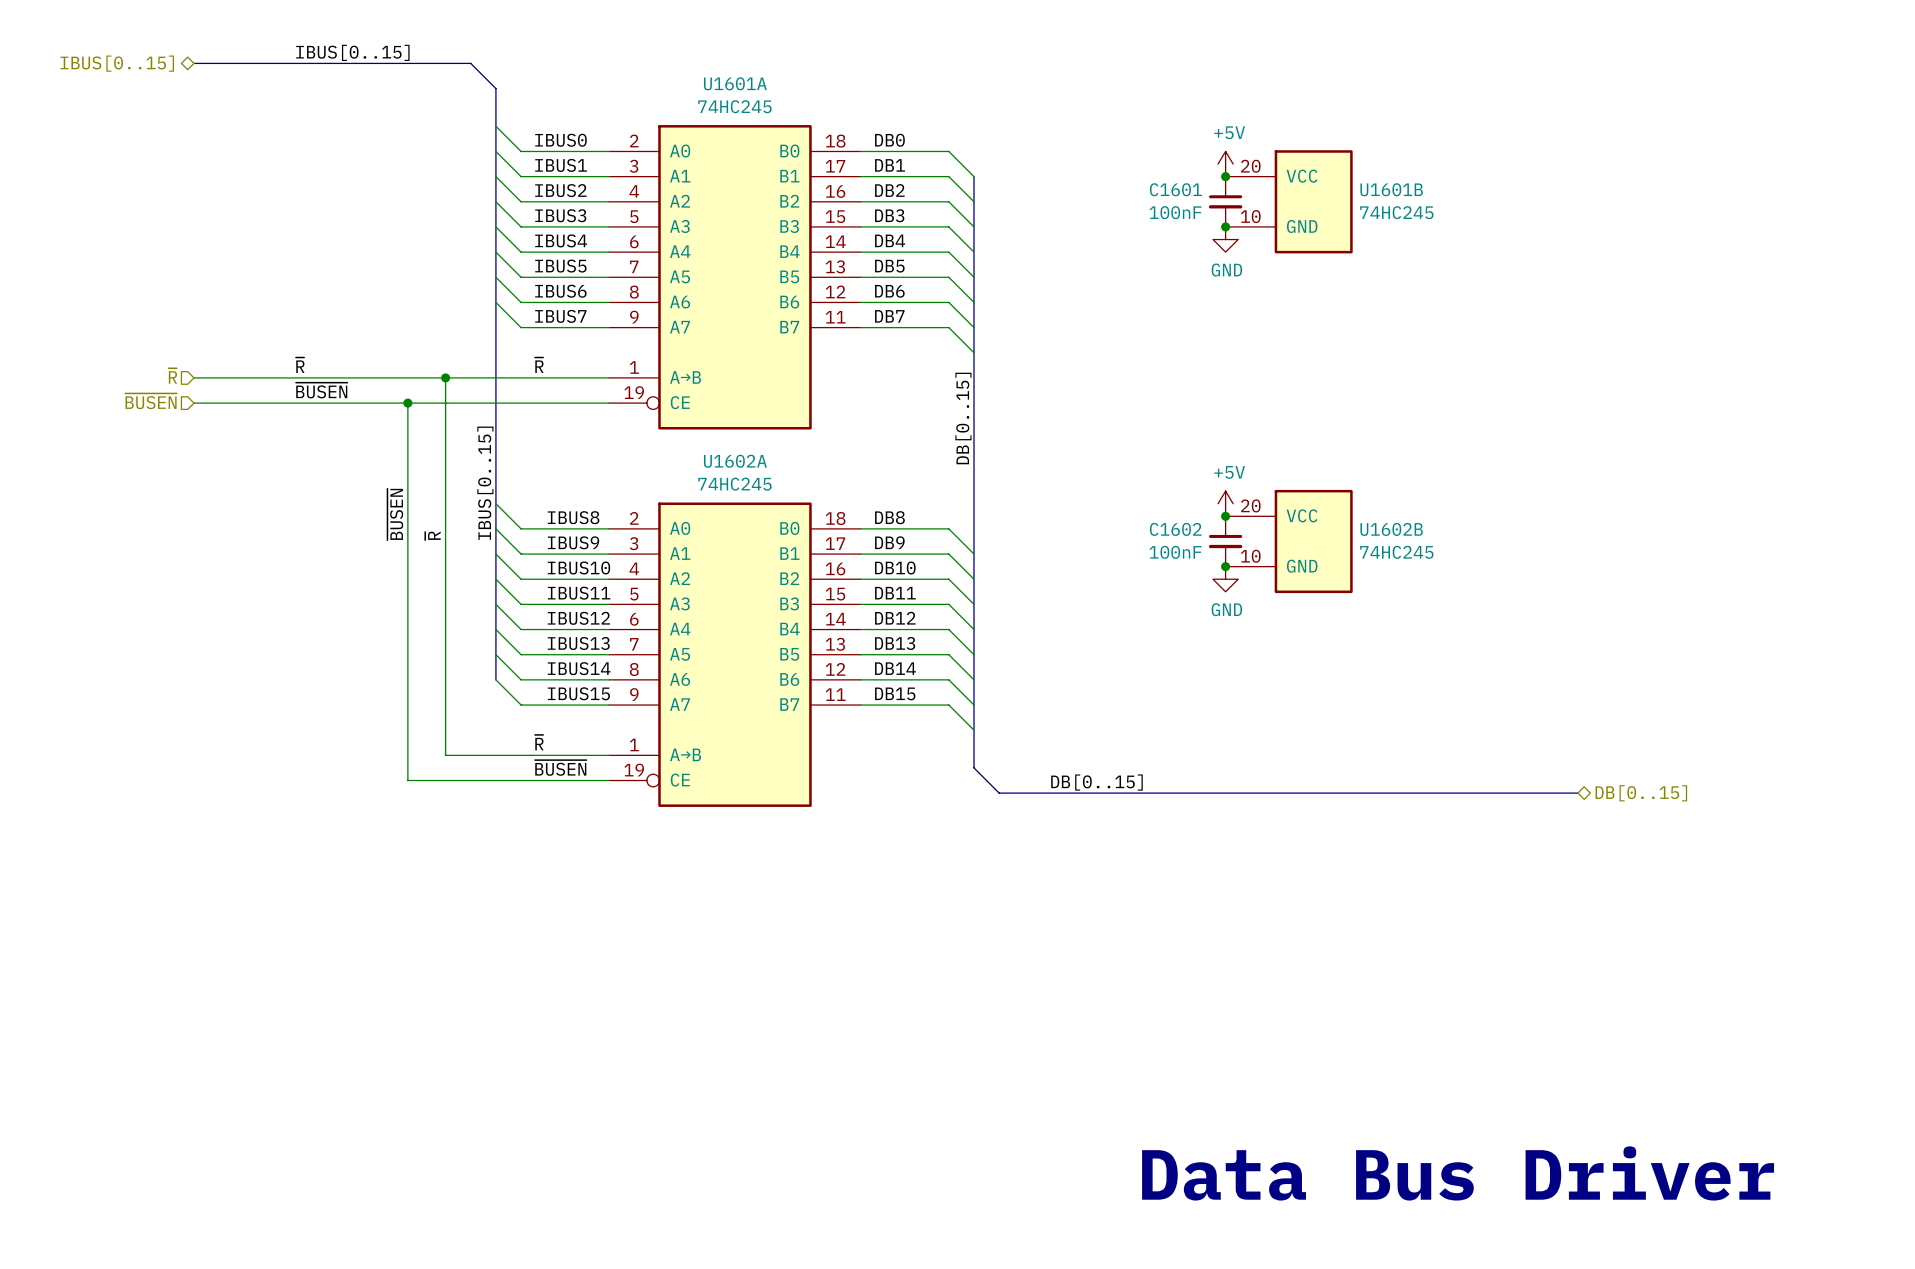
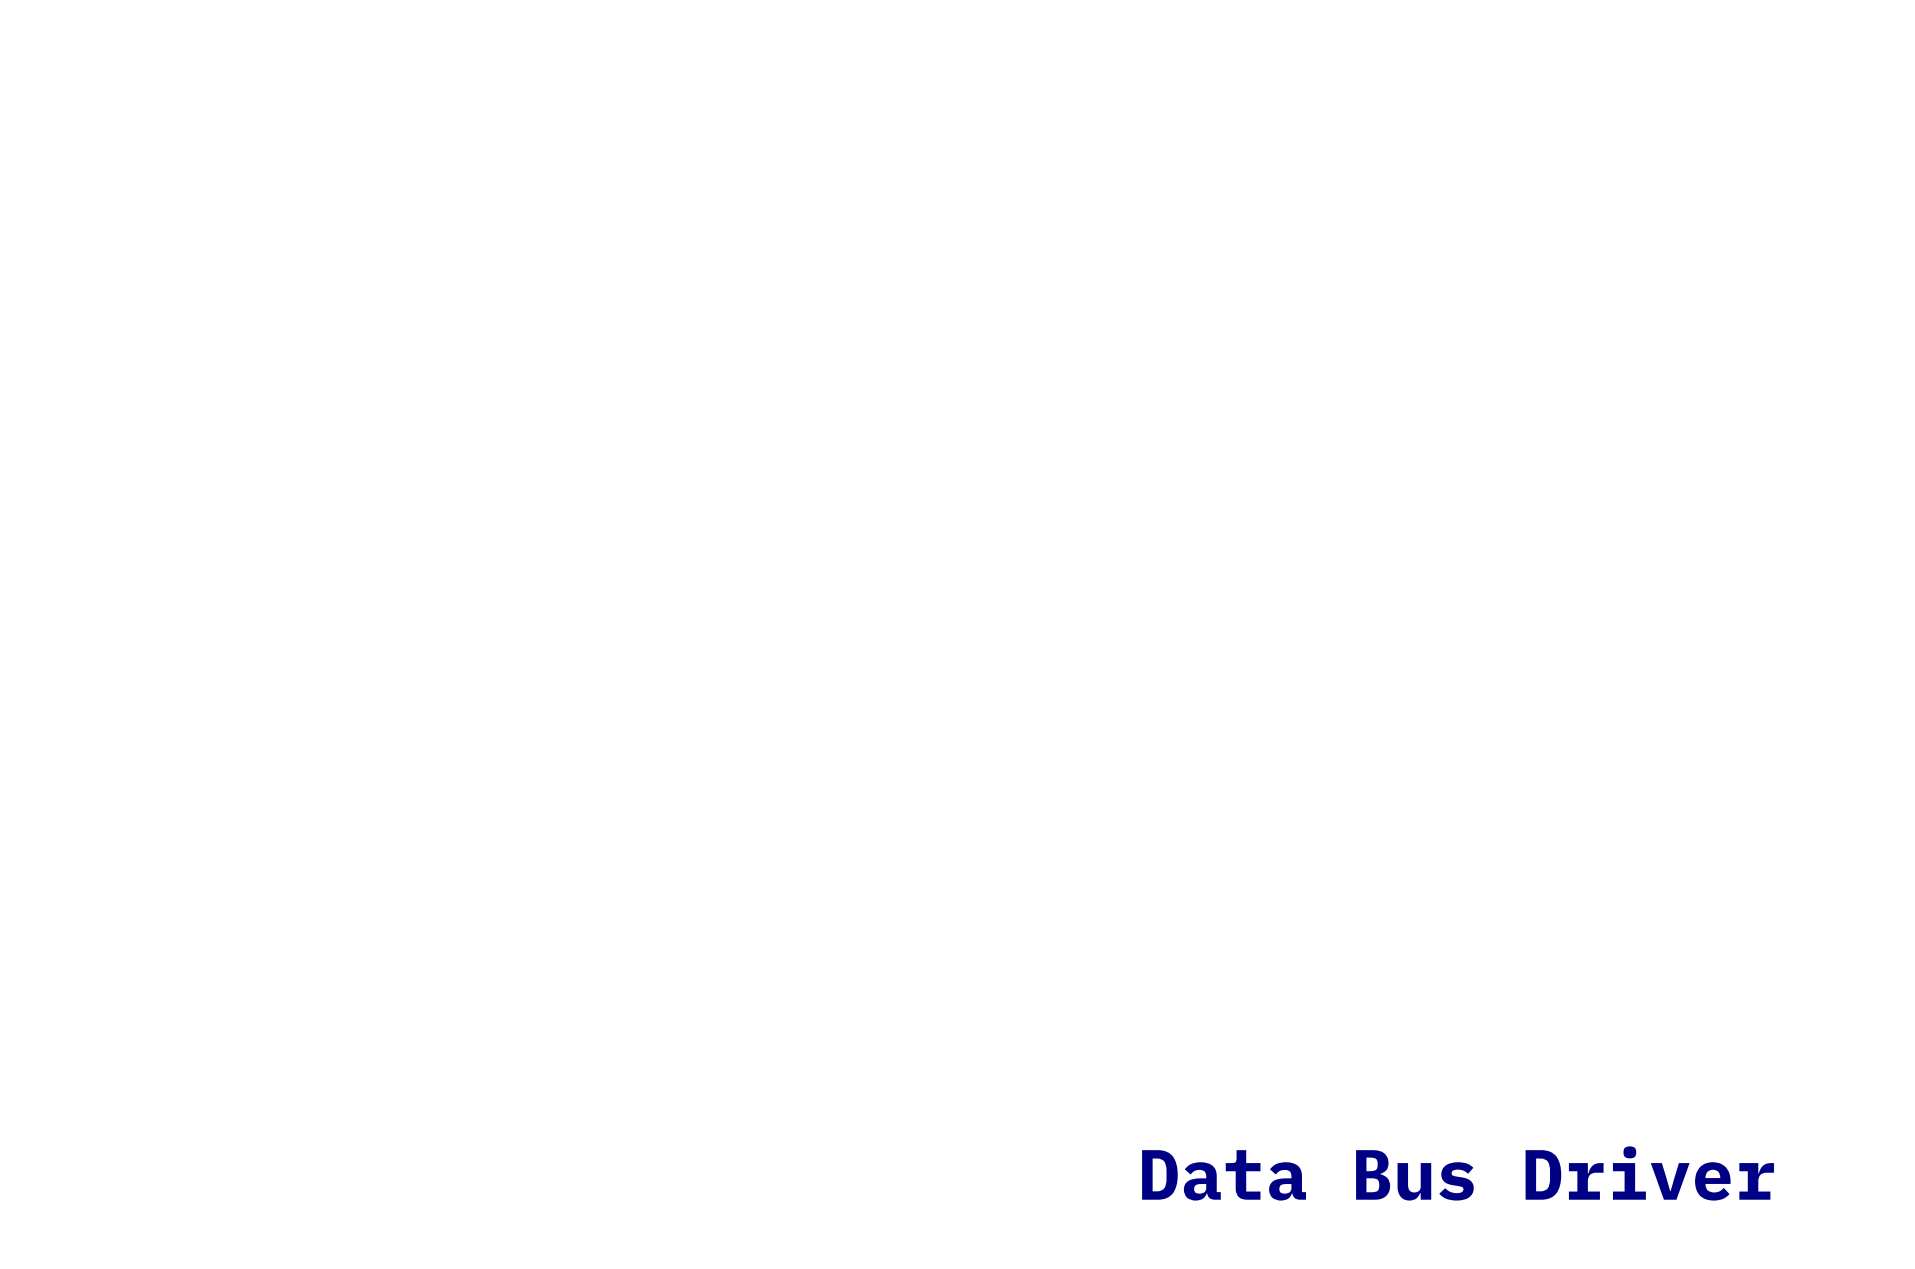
label: IBUS[0..15] (352, 52) -> none
hierarchical label: IBUS[0..15] (117, 63) -> none
bus: (194, 63) (470, 63) (495, 88) (495, 679) -> none
wire: (495, 126) (521, 151) (609, 151) -> none
label: IBUS0 (560, 140) -> none
label: DB0 (889, 140) -> none
wire: (495, 151) (521, 176) (609, 176) -> none
wire: (860, 151) (948, 151) (974, 176) -> none
power symbol: +5V (1225, 164) -> none
label: IBUS1 (561, 165) -> none
label: DB1 (890, 165) -> none
wire: (495, 176) (521, 201) (609, 201) -> none
wire: (860, 176) (948, 176) (974, 201) -> none
bus: (974, 176) (974, 767) (999, 793) (1577, 793) -> none
junction: (1225, 176) -> none
label: IBUS2 (560, 190) -> none
label: DB2 (889, 190) -> none
wire: (495, 201) (521, 226) (609, 226) -> none
wire: (860, 201) (948, 201) (974, 226) -> none
C1601: 100nF (1225, 201) -> none
U1601B: 74HC245 (1289, 201) -> none
label: IBUS3 (560, 215) -> none
label: DB3 (889, 215) -> none
wire: (495, 226) (521, 252) (609, 252) -> none
wire: (860, 226) (948, 226) (974, 252) -> none
junction: (1225, 226) -> none
power symbol: GND (1225, 239) -> none
label: IBUS4 (561, 240) -> none
label: DB4 (890, 240) -> none
wire: (495, 252) (521, 277) (609, 277) -> none
wire: (860, 252) (948, 252) (974, 277) -> none
label: IBUS5 (560, 266) -> none
label: DB5 (889, 266) -> none
wire: (495, 277) (521, 302) (609, 302) -> none
U1601A: 74HC245 (734, 277) -> none
wire: (860, 277) (948, 277) (974, 302) -> none
label: IBUS6 (560, 291) -> none
label: DB6 (889, 291) -> none
wire: (495, 302) (521, 327) (609, 327) -> none
wire: (860, 302) (948, 302) (974, 327) -> none
label: IBUS7 (560, 316) -> none
label: DB7 (889, 316) -> none
wire: (860, 327) (948, 327) (974, 352) -> none
label: ~{R} (300, 365) -> none
label: ~{R} (539, 365) -> none
hierarchical label: ~{R} (172, 376) -> none
wire: (194, 377) (609, 377) -> none
wire: (445, 377) (445, 755) (609, 755) -> none
junction: (445, 377) -> none
label: ~{BUSEN} (321, 390) -> none
hierarchical label: ~{BUSEN} (150, 401) -> none
wire: (194, 403) (609, 403) -> none
wire: (407, 403) (407, 780) (609, 780) -> none
junction: (407, 403) -> none
label: DB[0..15] (963, 418) -> none
label: IBUS[0..15] (485, 483) -> none
wire: (495, 503) (521, 528) (609, 528) -> none
power symbol: +5V (1225, 503) -> none
label: ~{BUSEN} (395, 514) -> none
junction: (1225, 516) -> none
label: IBUS8 (573, 517) -> none
label: DB8 (889, 517) -> none
wire: (495, 528) (521, 554) (609, 554) -> none
wire: (860, 528) (948, 528) (974, 554) -> none
label: ~{R} (432, 535) -> none
C1602: 100nF (1225, 541) -> none
U1602B: 74HC245 (1289, 541) -> none
label: IBUS9 (573, 542) -> none
label: DB9 (889, 542) -> none
wire: (495, 554) (521, 579) (609, 579) -> none
wire: (860, 554) (948, 554) (974, 579) -> none
junction: (1225, 566) -> none
label: IBUS10 (578, 567) -> none
label: DB10 (895, 567) -> none
wire: (495, 579) (521, 604) (609, 604) -> none
wire: (860, 579) (948, 579) (974, 604) -> none
power symbol: GND (1225, 579) -> none
label: IBUS11 (579, 593) -> none
label: DB11 (895, 593) -> none
wire: (495, 604) (521, 629) (609, 629) -> none
wire: (860, 604) (948, 604) (974, 629) -> none
label: IBUS12 (578, 618) -> none
label: DB12 (895, 618) -> none
wire: (495, 629) (521, 654) (609, 654) -> none
wire: (860, 629) (948, 629) (974, 654) -> none
label: IBUS13 (578, 643) -> none
label: DB13 (895, 643) -> none
wire: (495, 654) (521, 679) (609, 679) -> none
U1602A: 74HC245 (734, 654) -> none
wire: (860, 654) (948, 654) (974, 679) -> none
label: IBUS14 (579, 668) -> none
label: DB14 (895, 668) -> none
wire: (495, 679) (521, 705) (609, 705) -> none
wire: (860, 679) (948, 679) (974, 705) -> none
label: IBUS15 (578, 693) -> none
label: DB15 (895, 693) -> none
wire: (860, 705) (948, 705) (974, 730) -> none
label: ~{R} (539, 742) -> none
label: ~{BUSEN} (560, 767) -> none
label: DB[0..15] (1096, 782) -> none
hierarchical label: DB[0..15] (1641, 793) -> none

